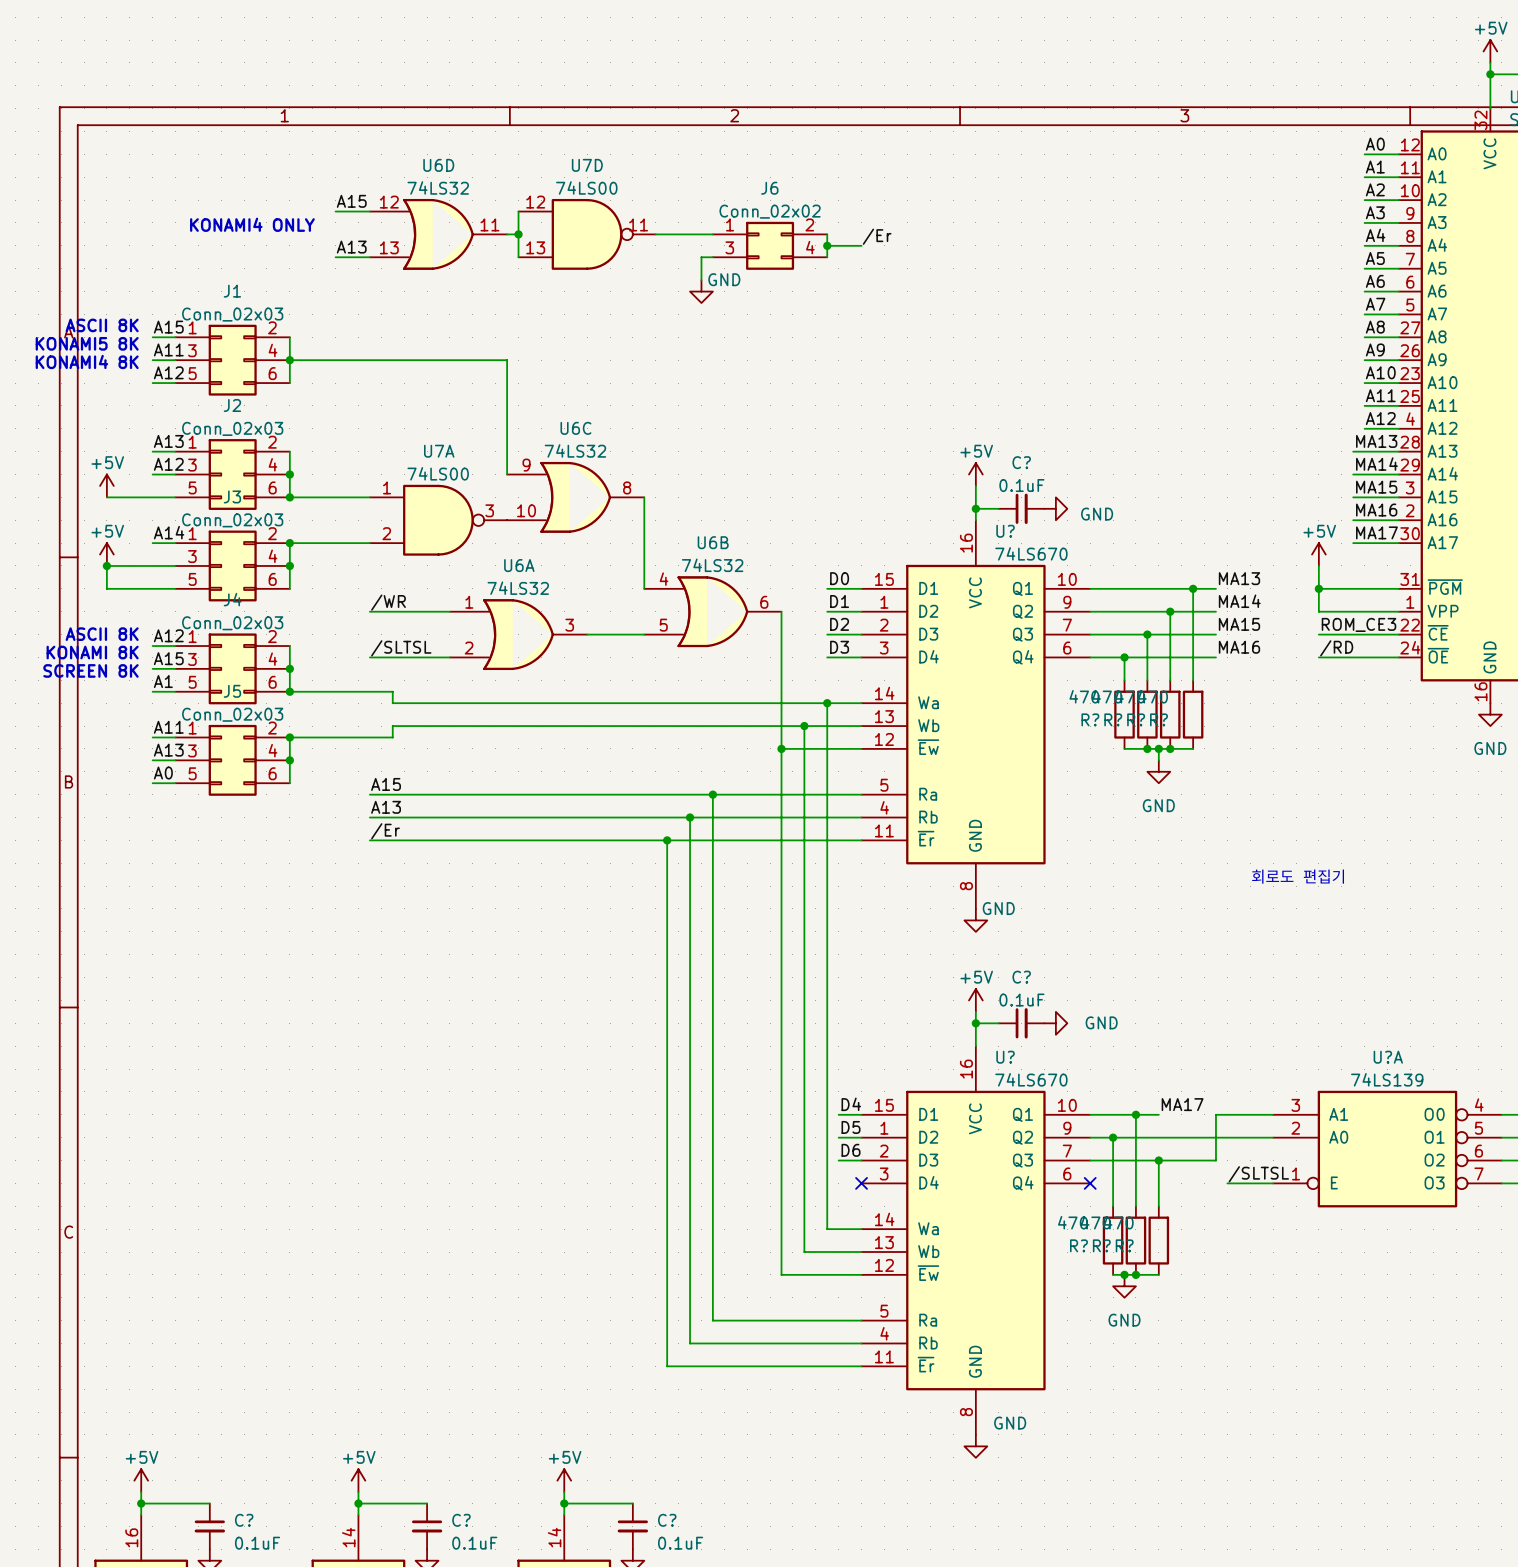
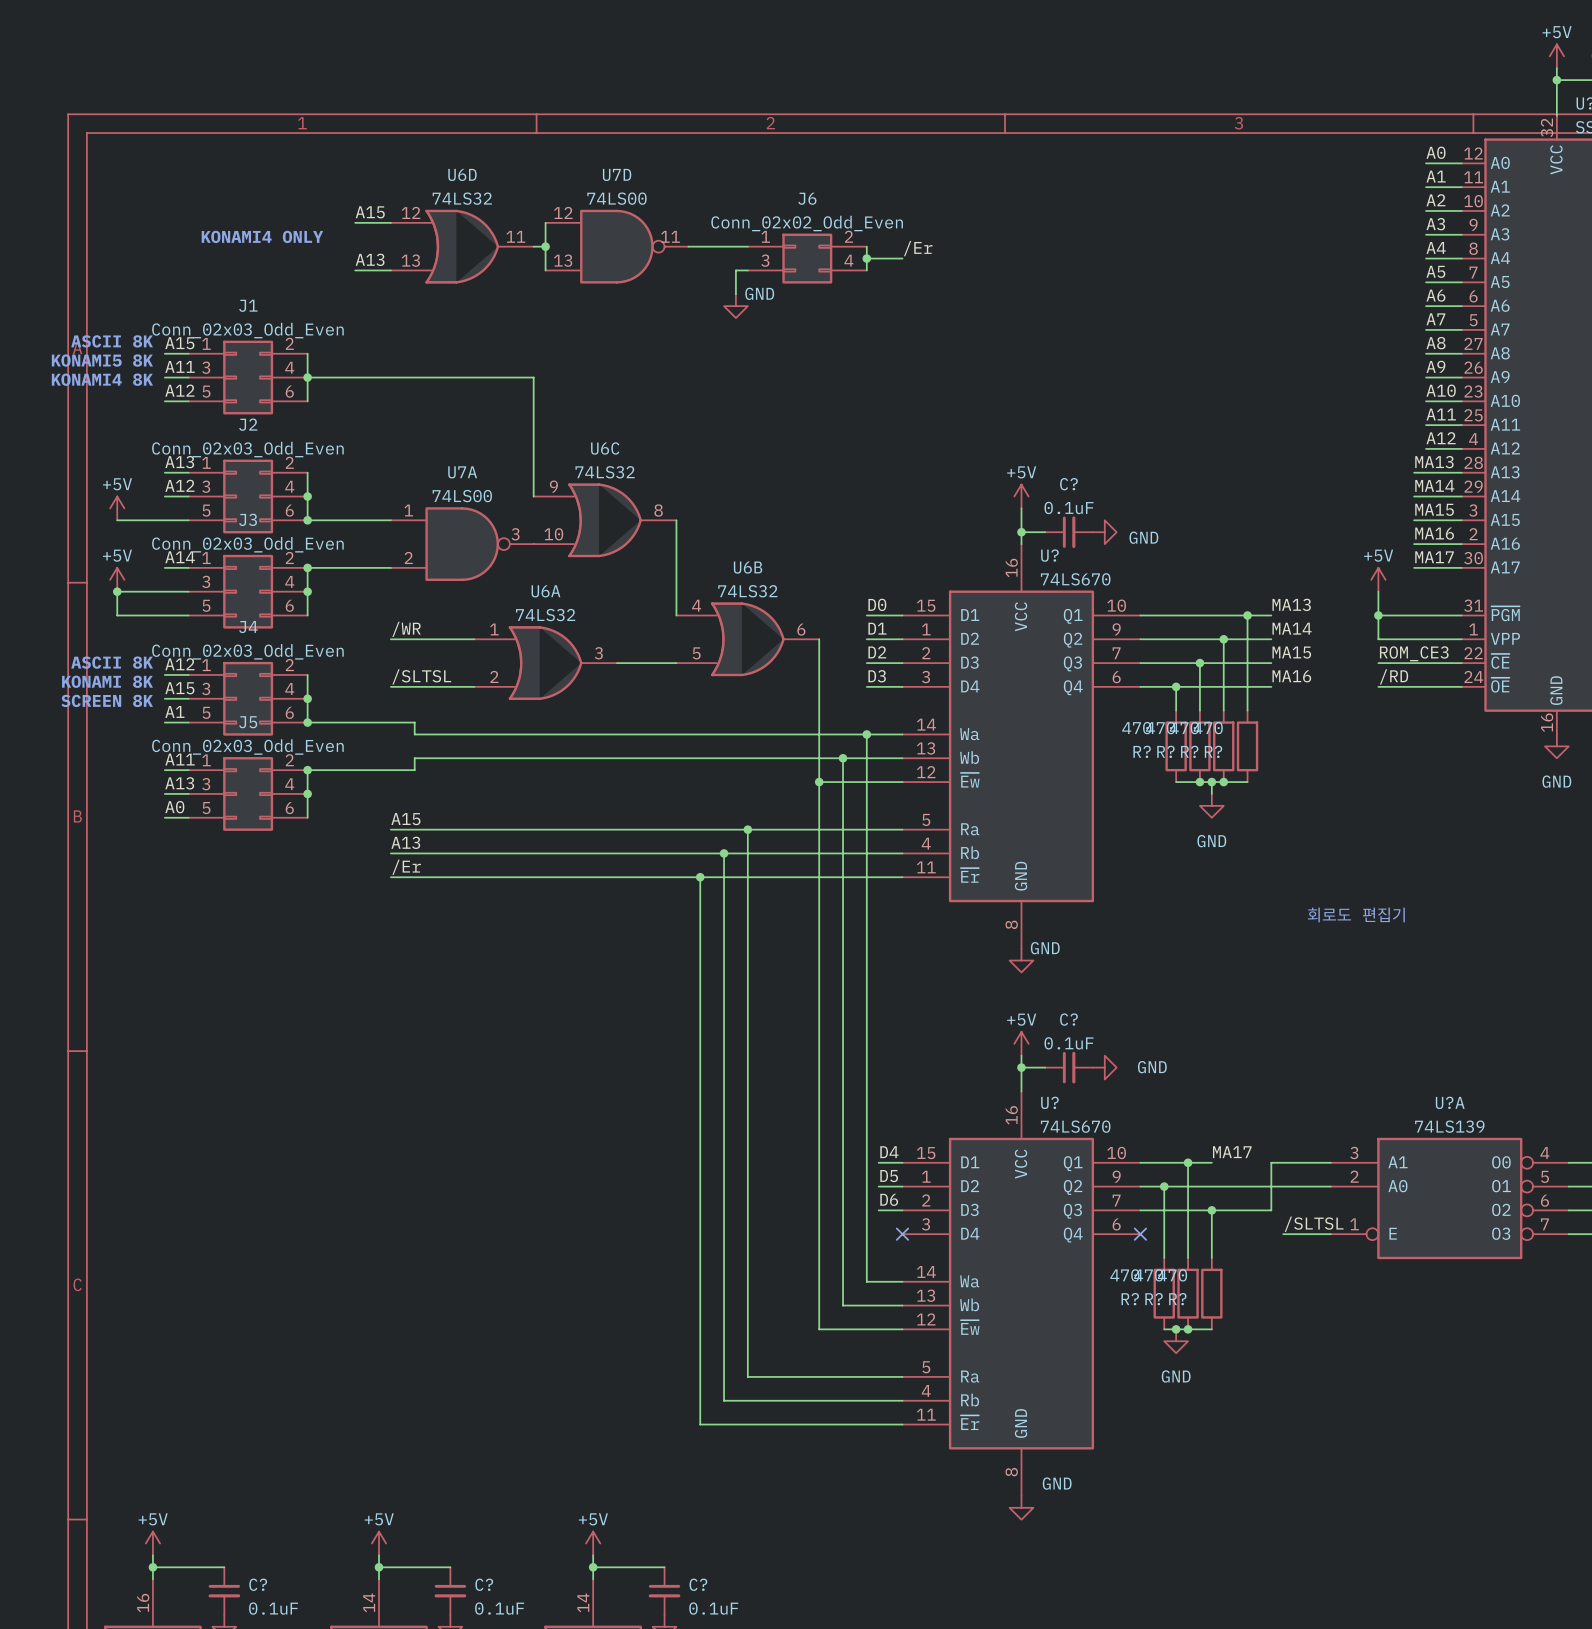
J6 value: Conn_02x02 (770, 211) -> Conn_02x02_Odd_Even (807, 223)
J1 value: Conn_02x03 (232, 314) -> Conn_02x03_Odd_Even (247, 330)
J2 value: Conn_02x03 (232, 428) -> Conn_02x03_Odd_Even (247, 449)
J3 value: Conn_02x03 (232, 520) -> Conn_02x03_Odd_Even (247, 544)
J4 value: Conn_02x03 (232, 623) -> Conn_02x03_Odd_Even (247, 651)
J5 value: Conn_02x03 (232, 714) -> Conn_02x03_Odd_Even (247, 747)

